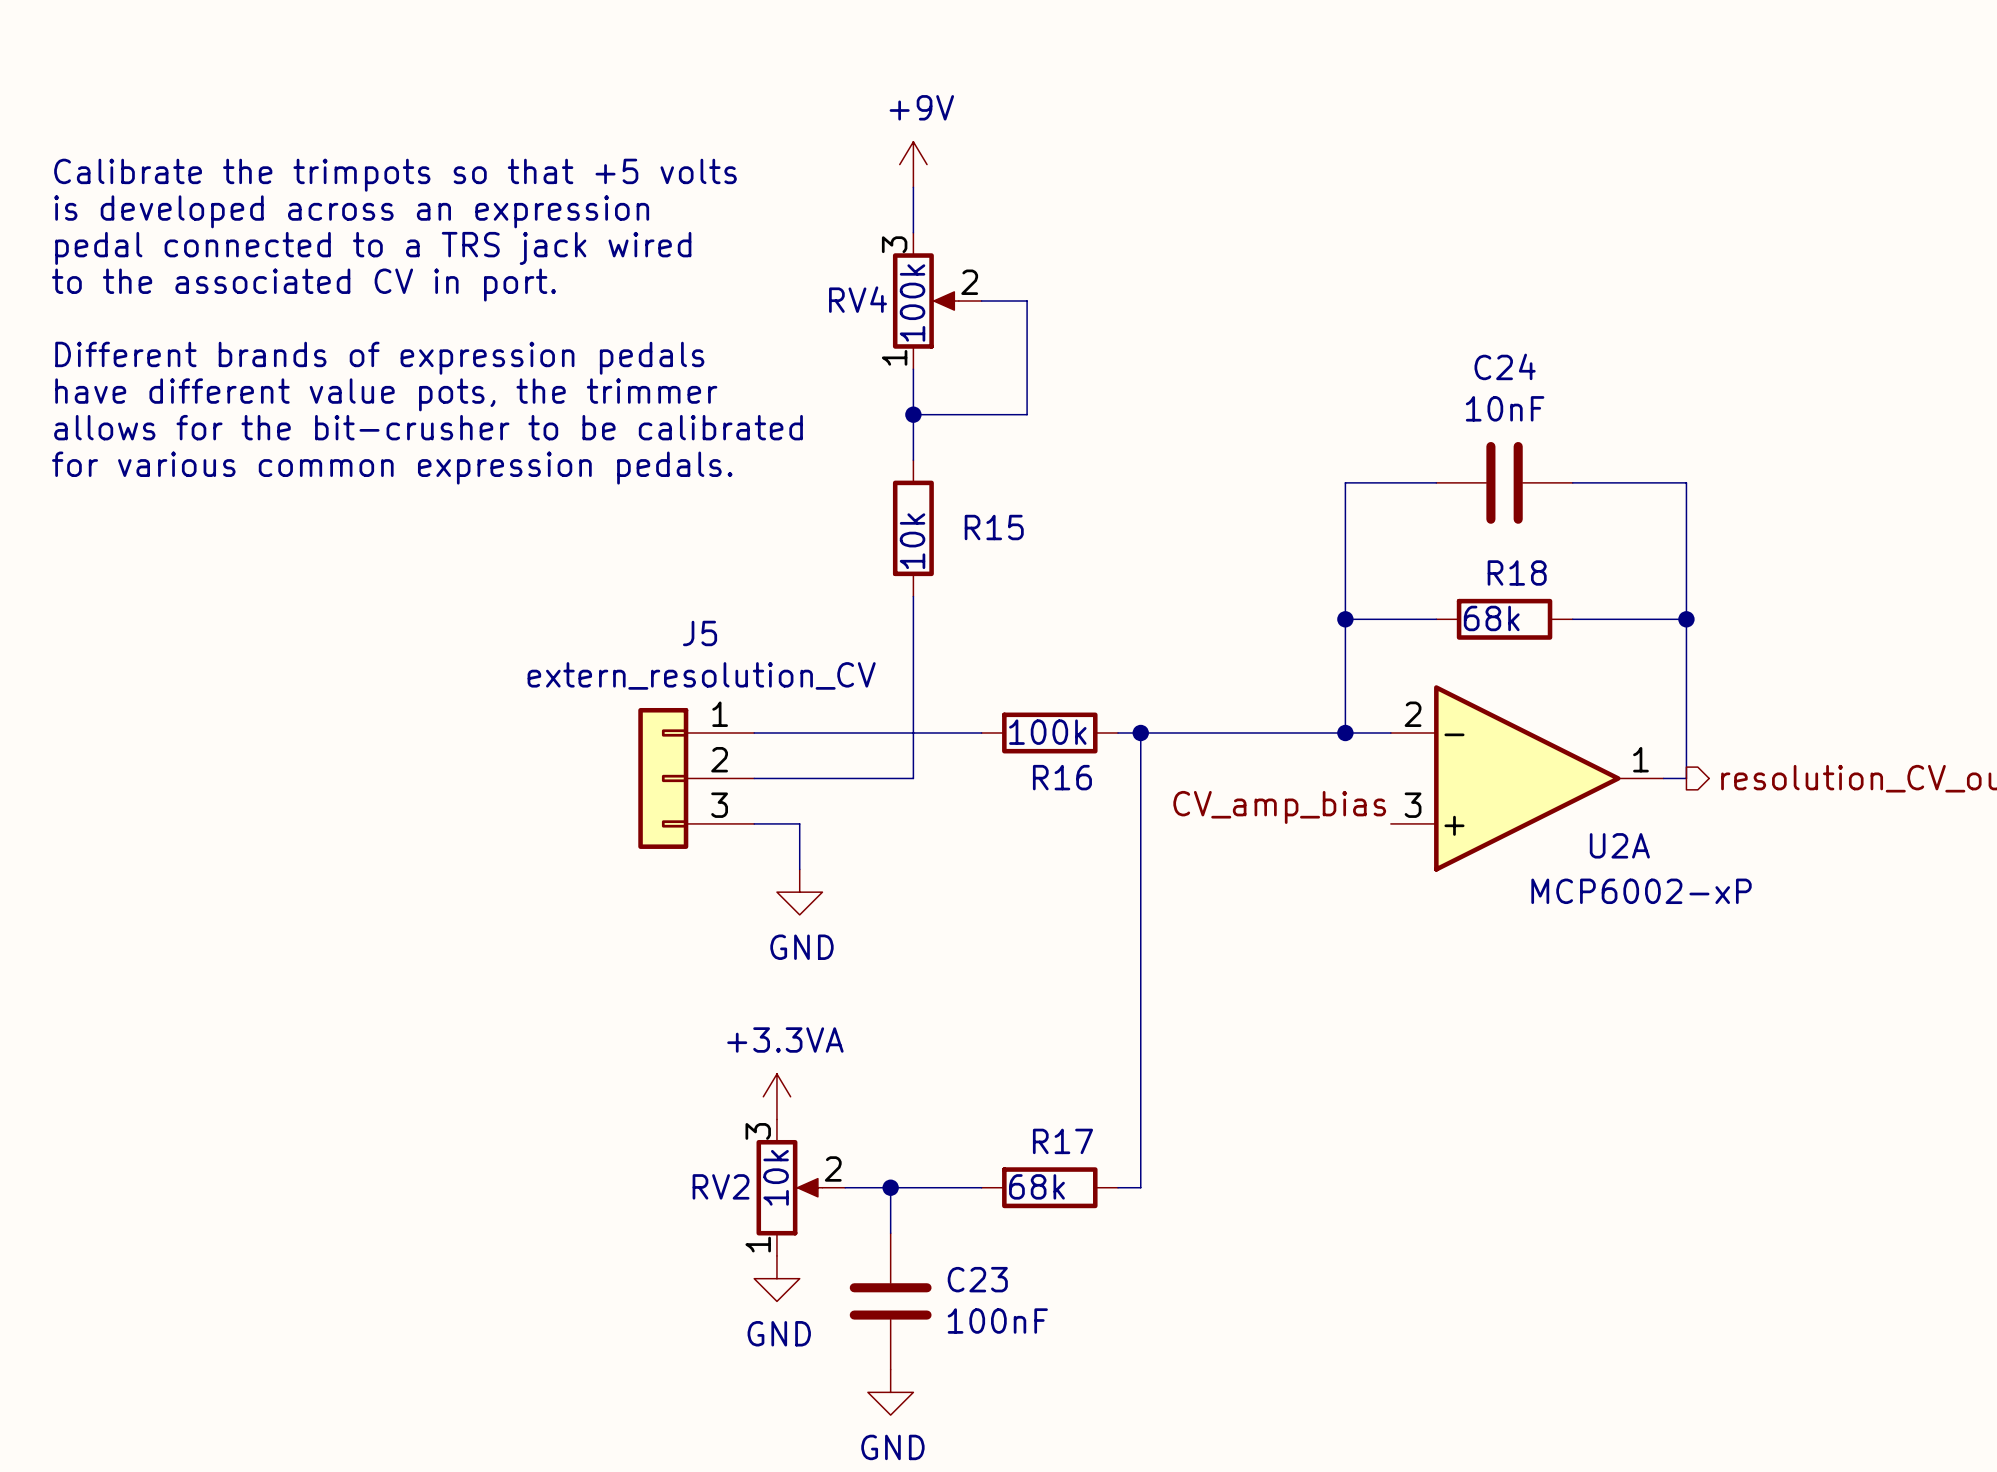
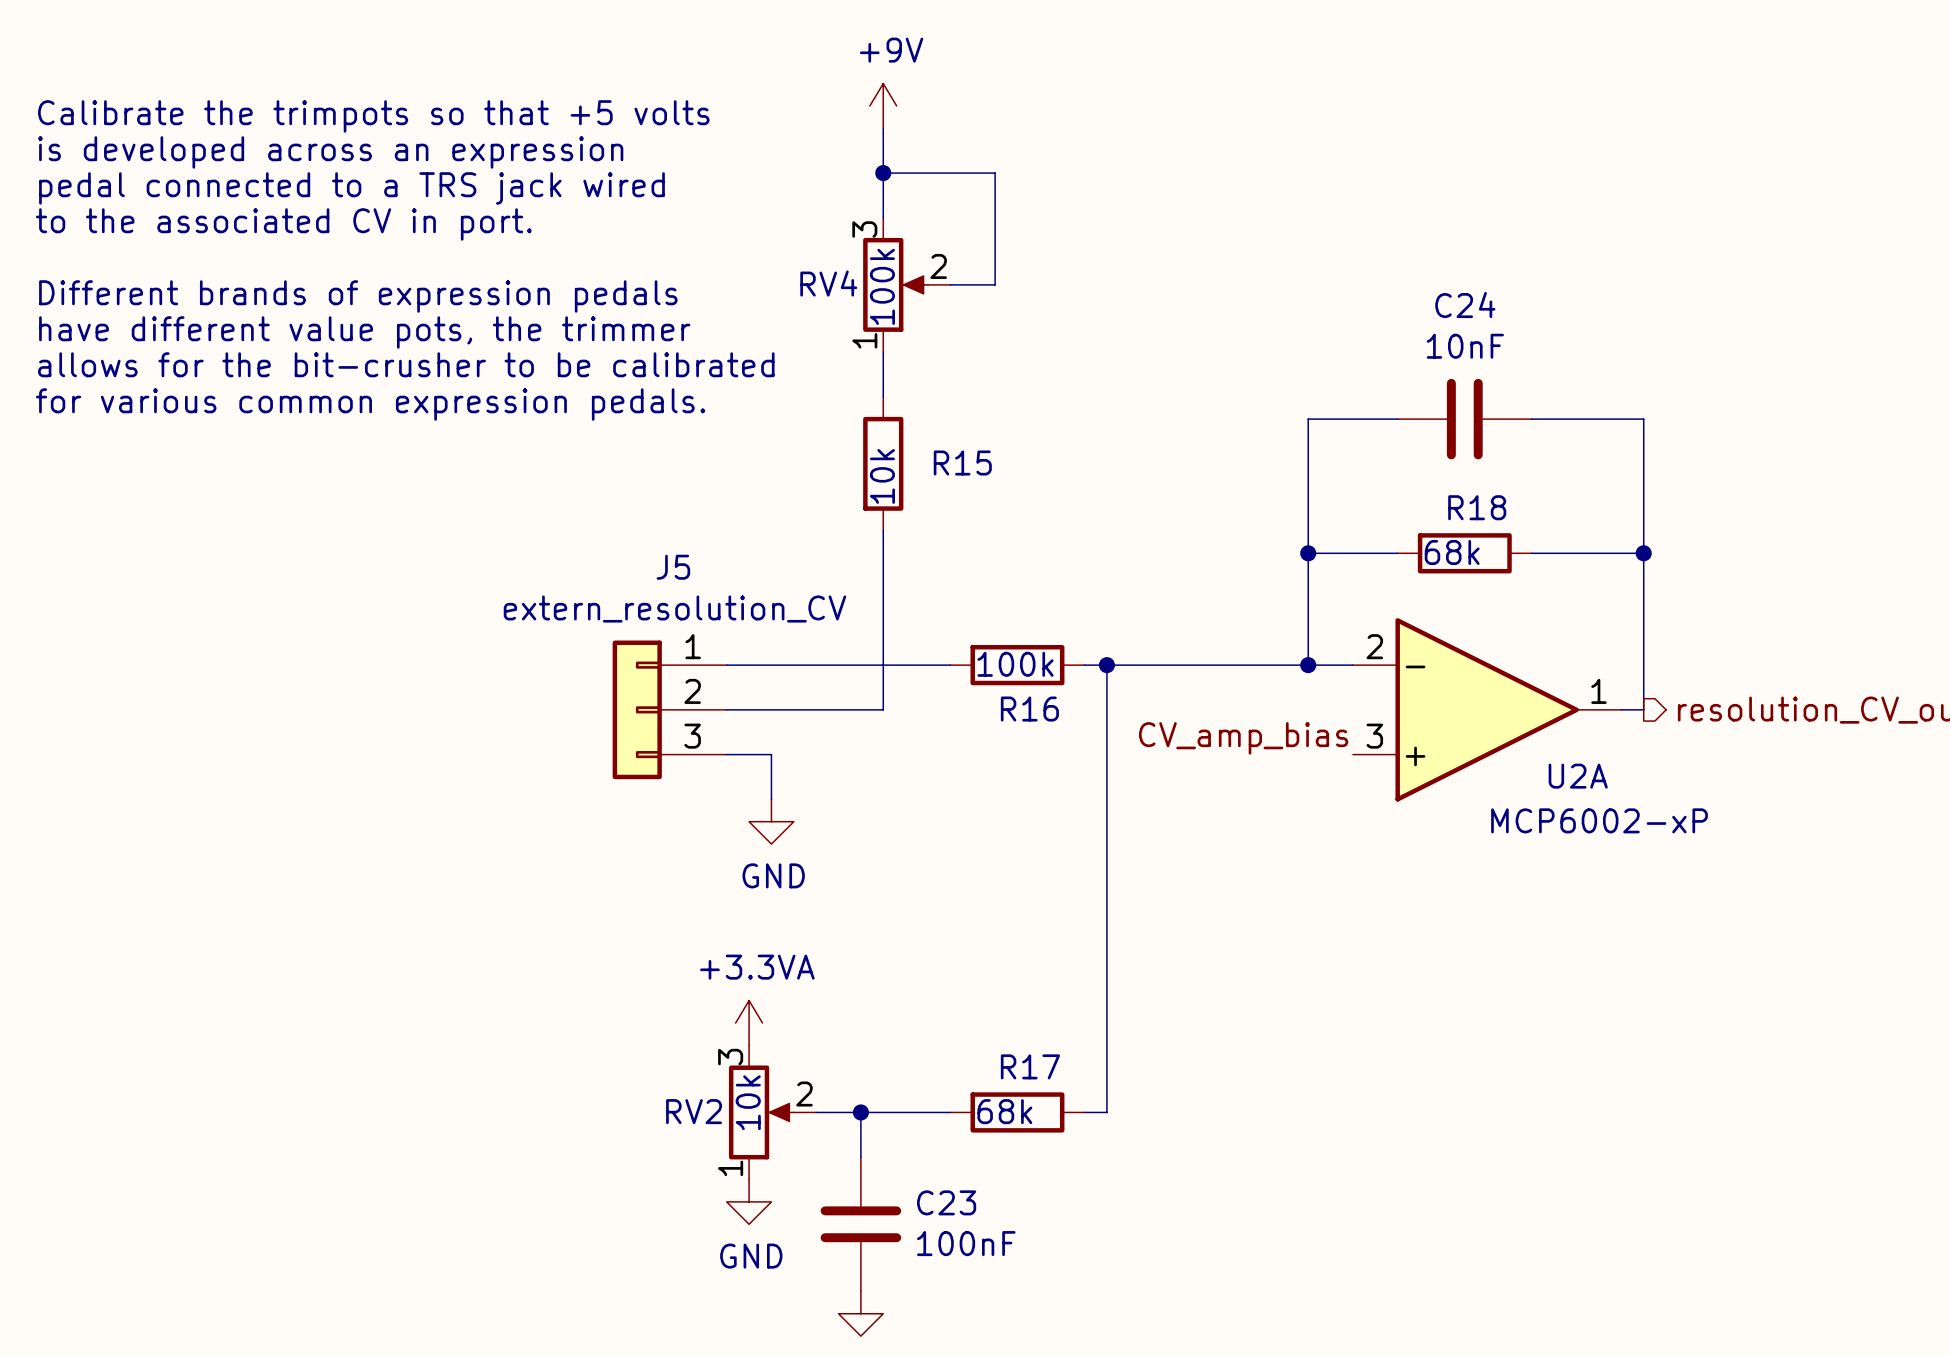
junction: none -> (883, 173)
RV4 position: (937, 301) -> (906, 284)
wire: (981, 301) (1027, 301) -> (883, 217) (883, 173) (995, 173) (995, 240)
wire: (1027, 346) (1027, 414) (913, 414) (913, 369) -> (995, 284) (950, 284)
junction: (913, 414) -> none

